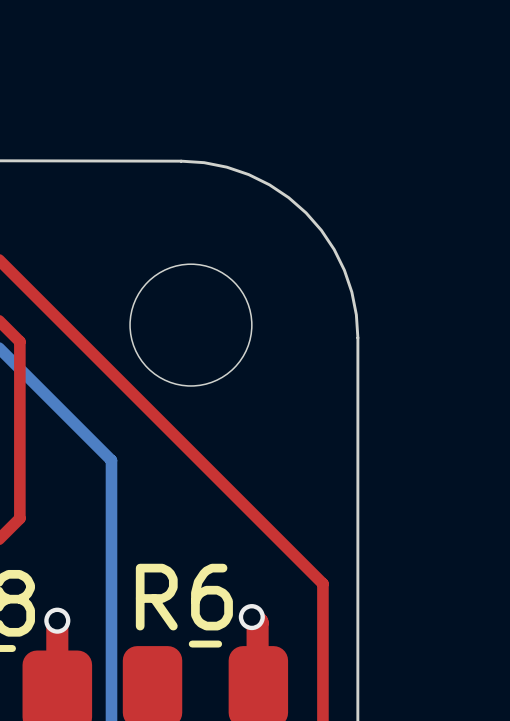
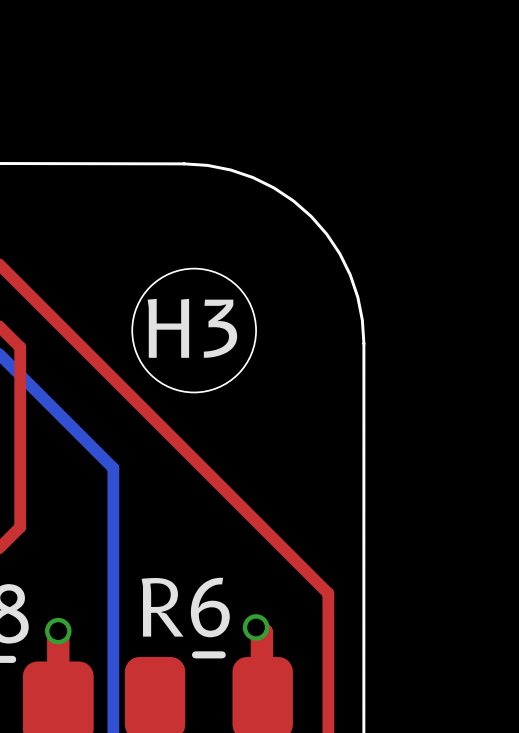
H3 name: none -> H3 (192, 328)

